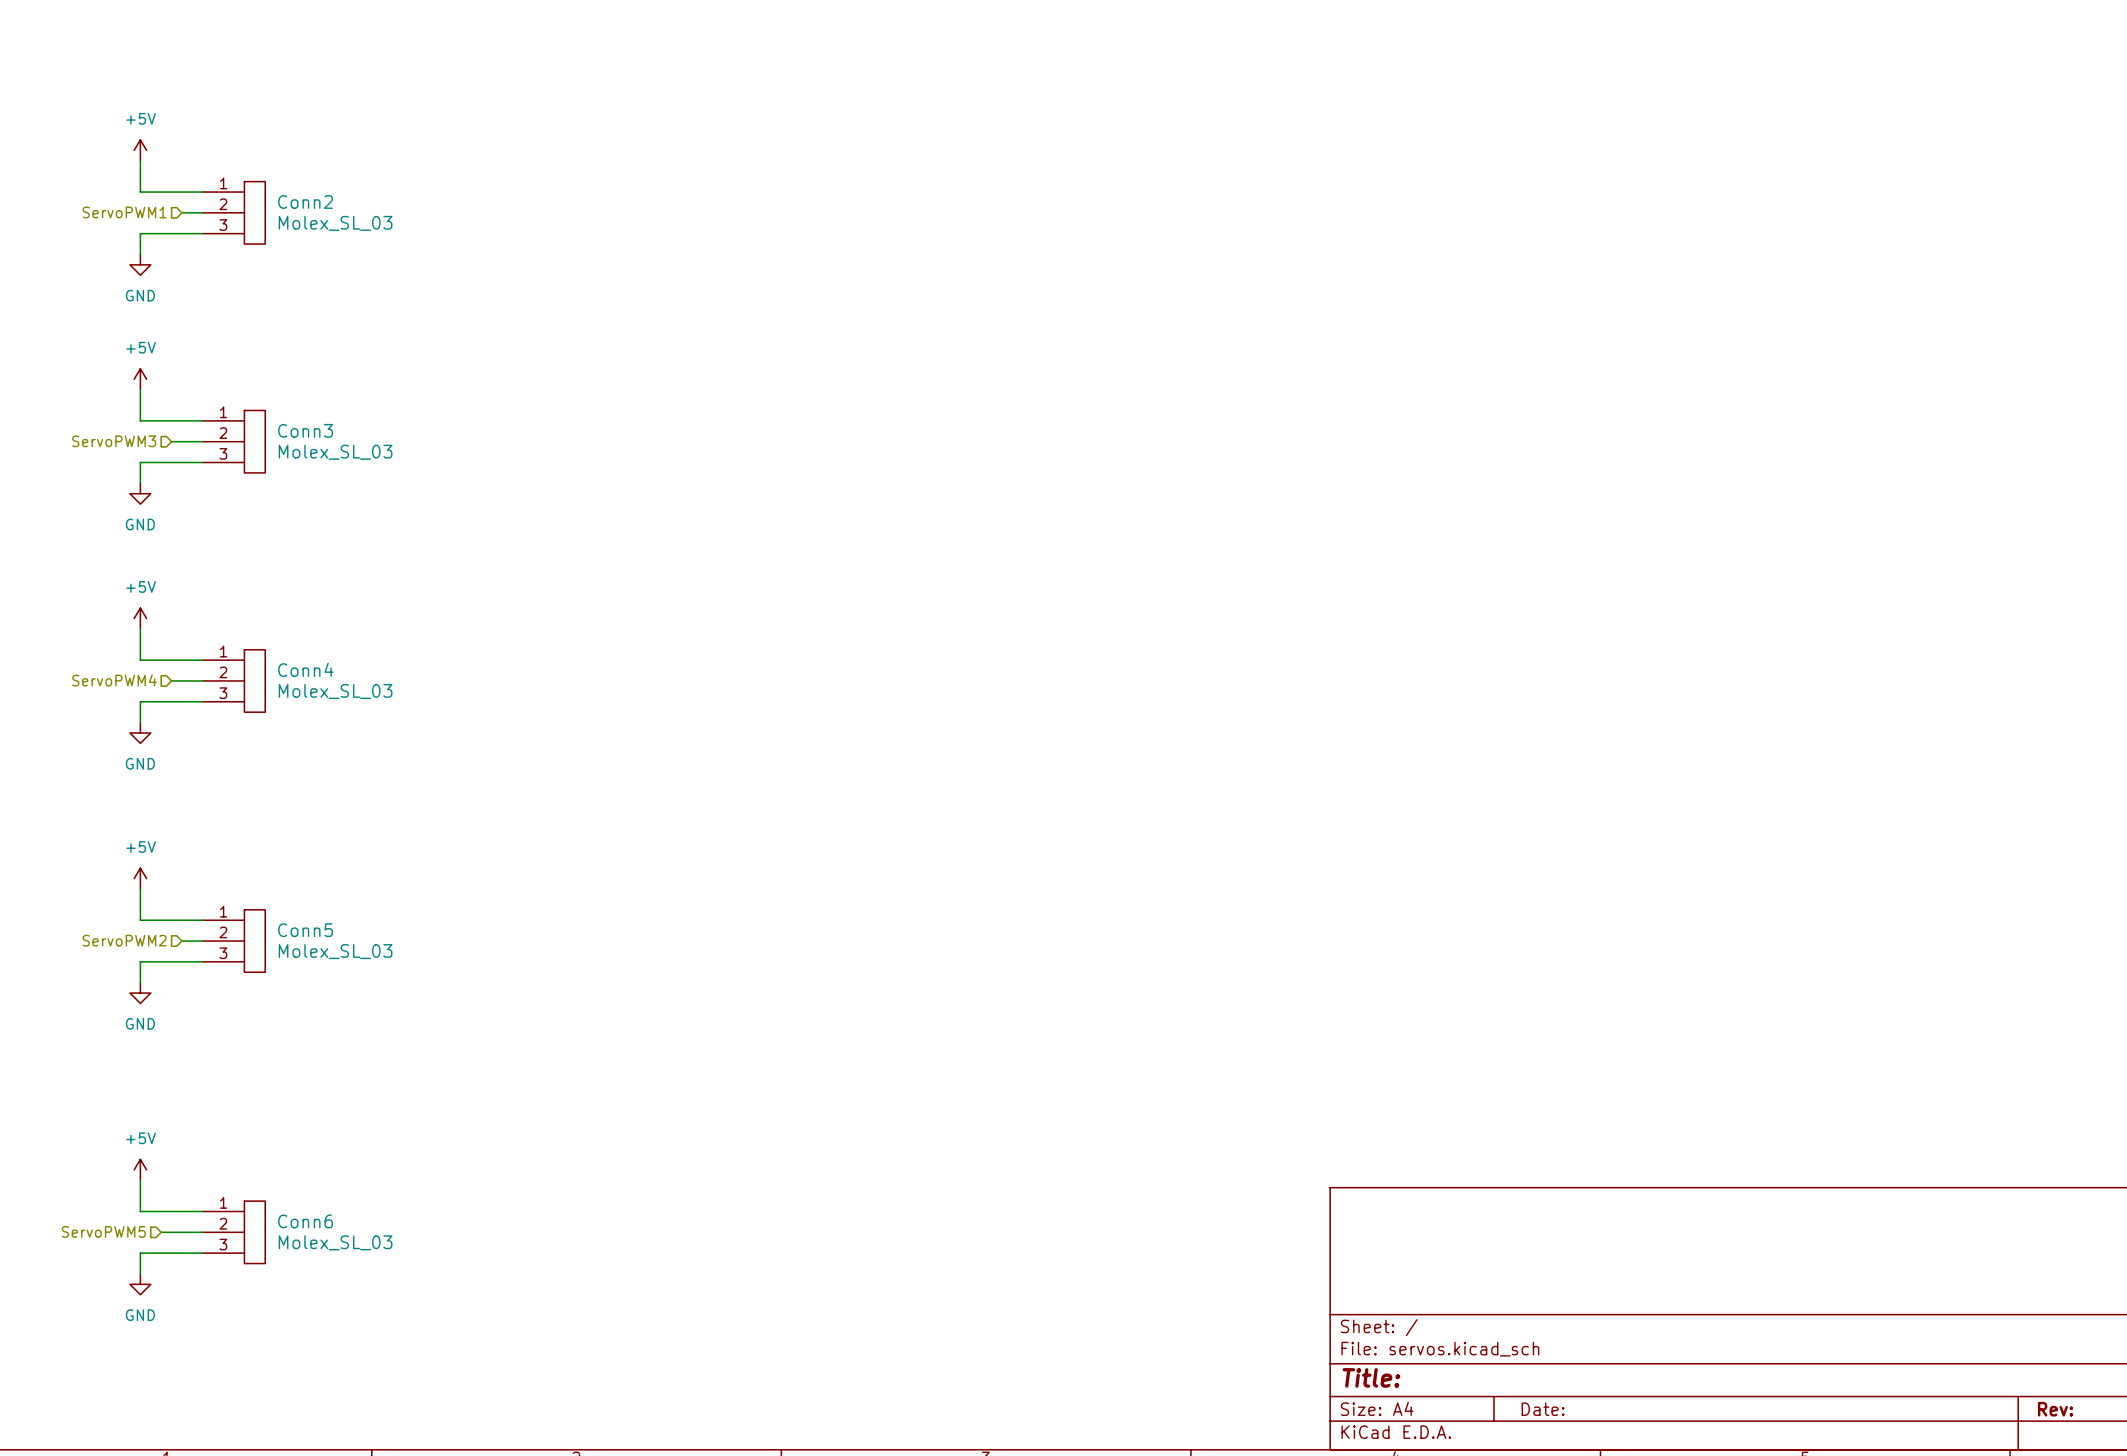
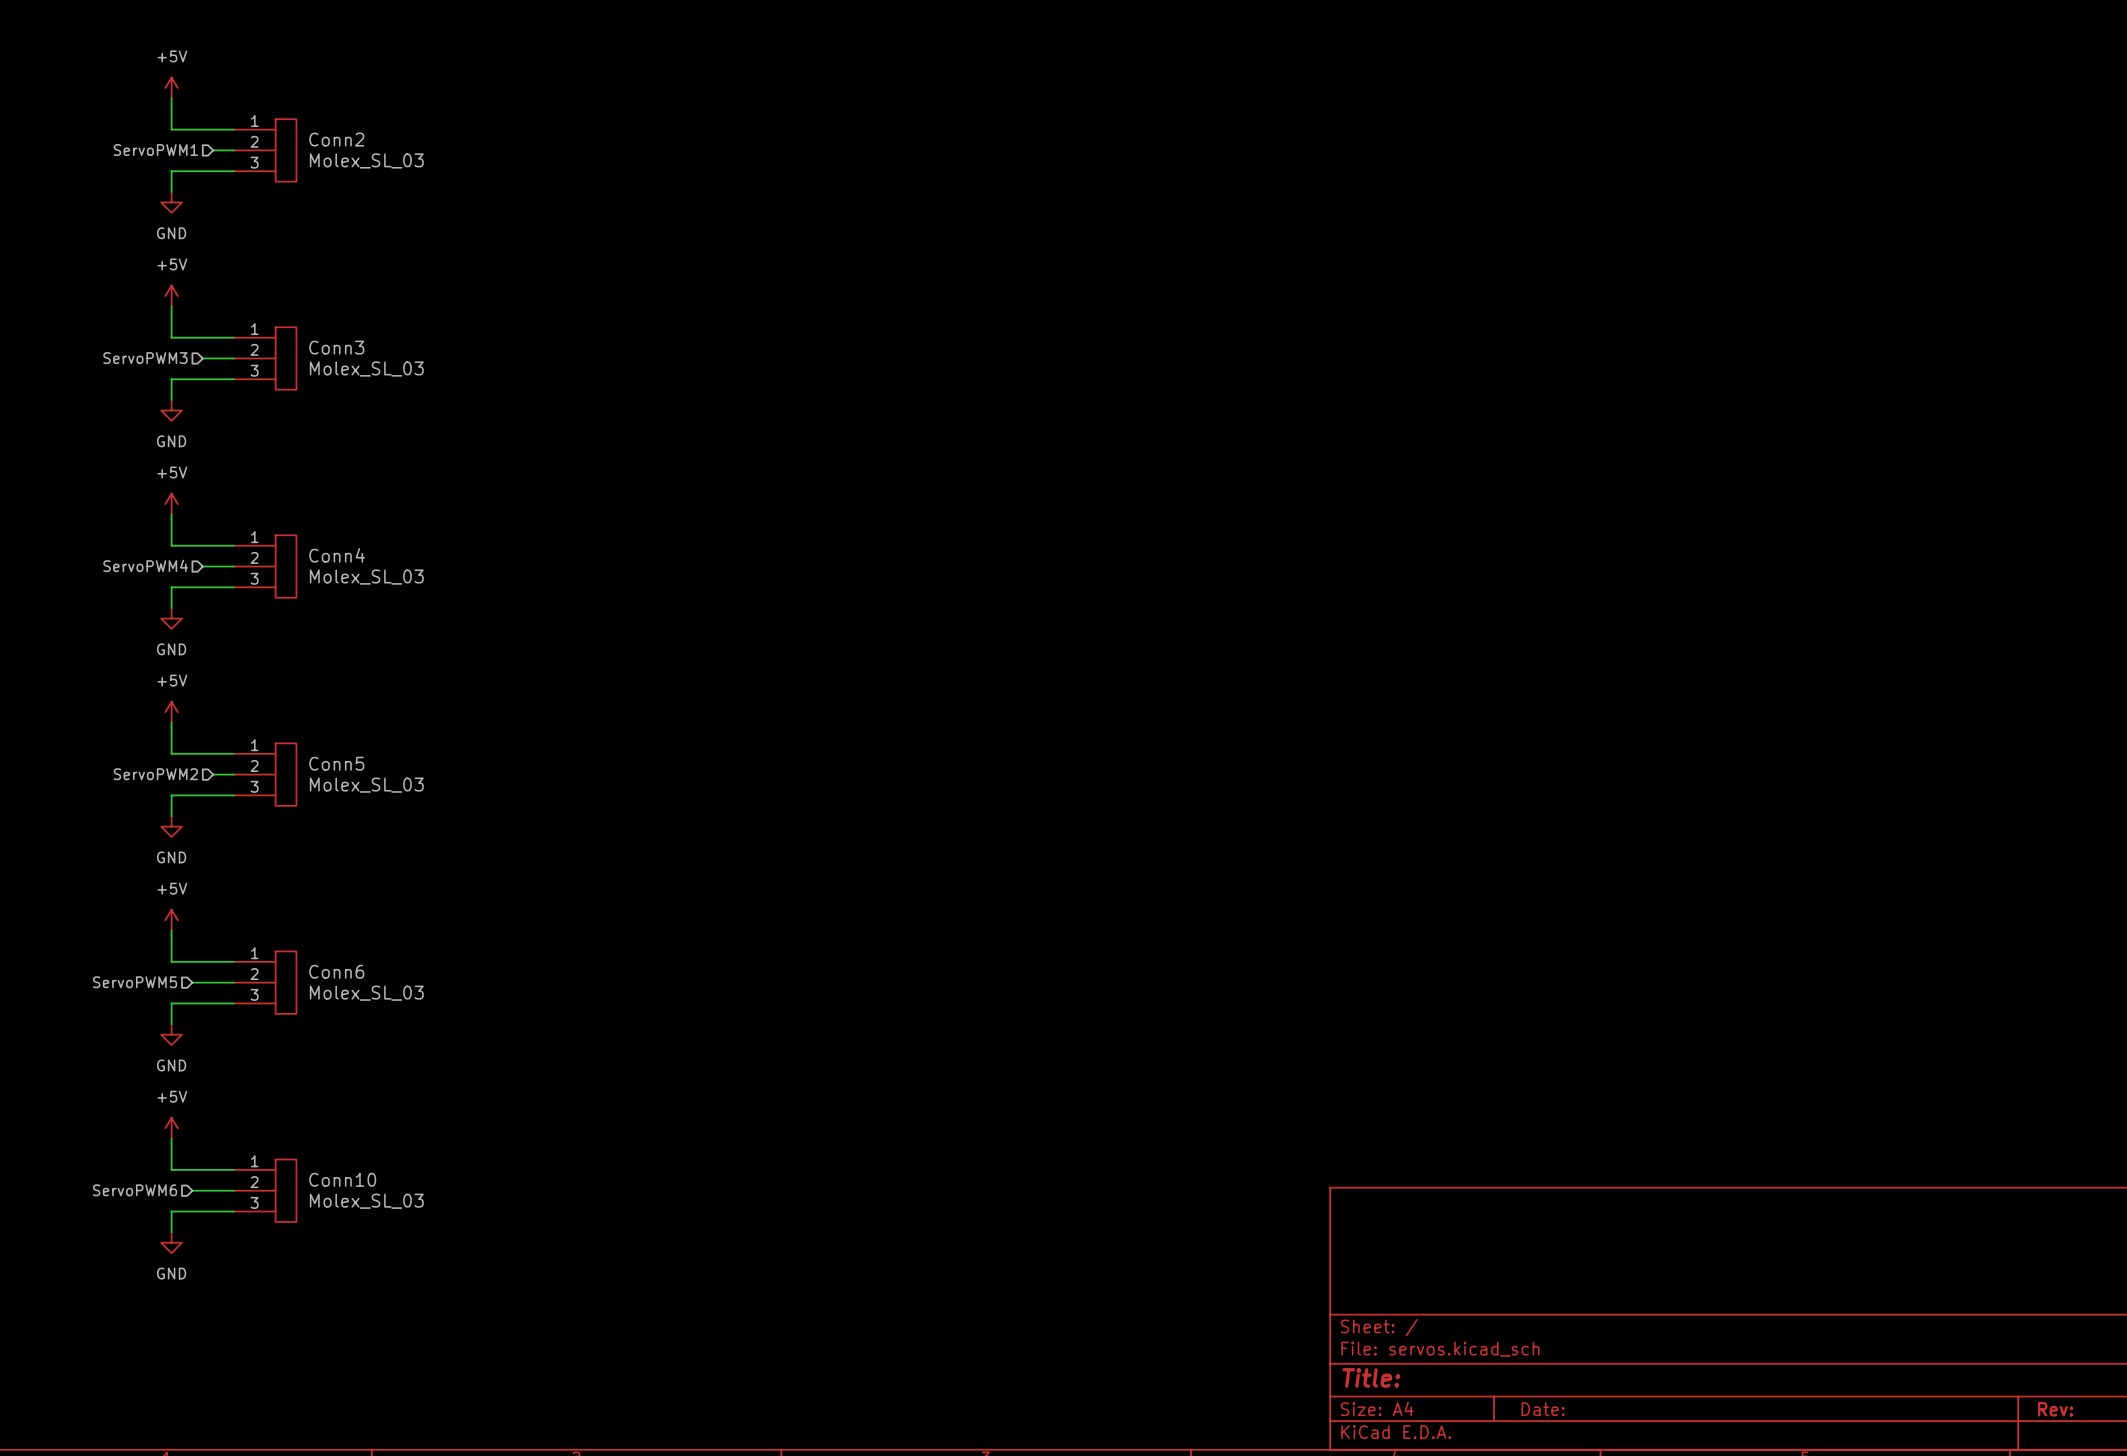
power symbol position: +5V (140, 150) -> +5V (171, 88)
wire: (140, 160) (140, 192) (202, 192) -> (171, 98) (171, 129) (234, 129)
hierarchical label position: ServoPWM1 (124, 212) -> ServoPWM1 (155, 150)
wire: (181, 212) (202, 212) -> (213, 150) (234, 150)
Conn2 position: (234, 212) -> (265, 150)
wire: (202, 233) (140, 233) (140, 254) -> (234, 171) (171, 171) (171, 192)
power symbol position: GND (140, 264) -> GND (171, 202)
power symbol: none -> +5V (171, 296)
power symbol: +5V (140, 379) -> none
wire: (140, 389) (140, 420) (202, 420) -> (171, 306) (171, 337) (234, 337)
power symbol: none -> GND (171, 410)
hierarchical label position: ServoPWM3 (114, 441) -> ServoPWM3 (145, 358)
wire: (171, 441) (202, 441) -> (202, 358) (234, 358)
Conn3 position: (234, 441) -> (265, 358)
wire: (202, 462) (140, 462) (140, 483) -> (234, 379) (171, 379) (171, 400)
power symbol: GND (140, 493) -> none
power symbol: none -> +5V (171, 504)
power symbol: +5V (140, 618) -> none
power symbol: none -> GND (171, 618)
wire: (140, 628) (140, 660) (202, 660) -> (171, 514) (171, 545) (234, 545)
hierarchical label position: ServoPWM4 (114, 680) -> ServoPWM4 (145, 565)
wire: (171, 680) (202, 680) -> (202, 566) (234, 566)
Conn4 position: (234, 680) -> (265, 566)
wire: (202, 701) (140, 701) (140, 722) -> (234, 587) (171, 587) (171, 608)
power symbol: none -> +5V (171, 712)
power symbol: GND (140, 732) -> none
wire: none -> (234, 795) (171, 795) (171, 816)
power symbol: none -> GND (171, 826)
power symbol position: +5V (140, 878) -> +5V (171, 920)
wire: (140, 889) (140, 920) (202, 920) -> (171, 722) (171, 753) (234, 753)
hierarchical label position: ServoPWM2 (124, 940) -> ServoPWM2 (155, 774)
wire: (181, 941) (202, 941) -> (213, 774) (234, 774)
Conn5 position: (234, 941) -> (265, 774)
wire: (171, 961) (140, 961) (140, 982) -> (171, 961) (171, 930)
hierarchical label: none -> ServoPWM5 (135, 982)
wire: none -> (192, 982) (234, 982)
power symbol position: GND (140, 993) -> GND (171, 1034)
wire: none -> (234, 1003) (171, 1003) (171, 1024)
wire: none -> (171, 1138) (171, 1169) (234, 1169)
power symbol position: +5V (140, 1169) -> +5V (171, 1128)
wire: (140, 1180) (140, 1211) (171, 1211) -> (171, 1232) (171, 1211)
hierarchical label: none -> ServoPWM6 (135, 1190)
Conn10: none -> Molex_SL_03 (265, 1190)
hierarchical label: ServoPWM5 (103, 1231) -> none
wire: (161, 1232) (202, 1232) -> (192, 1190) (234, 1190)
Conn6 position: (234, 1232) -> (265, 982)
wire: (202, 1253) (140, 1253) (140, 1273) -> none
power symbol position: GND (140, 1284) -> GND (171, 1242)

